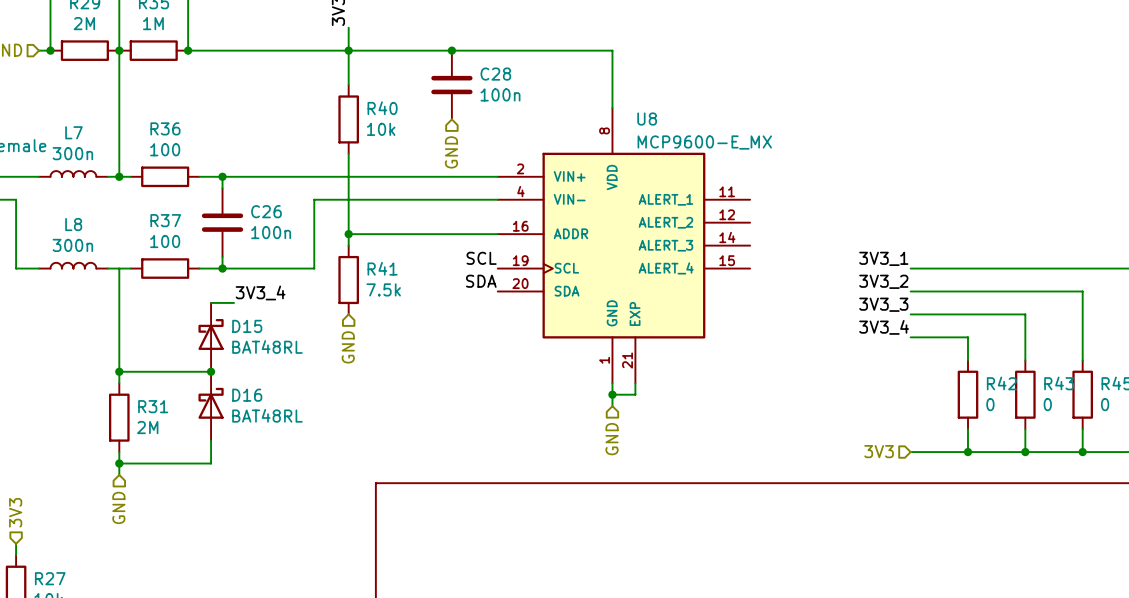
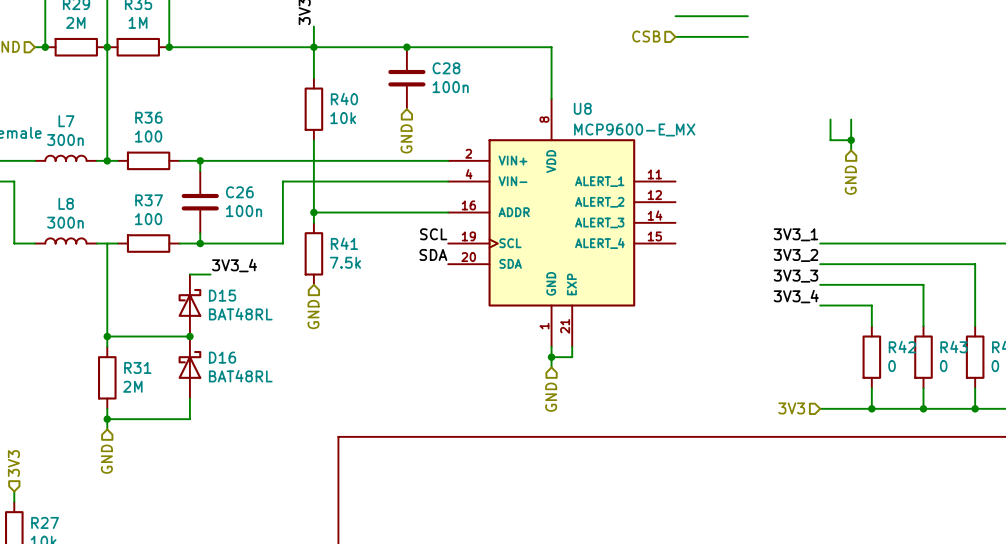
wire: none -> (675, 16) (747, 16)
hierarchical label: none -> CSB (646, 36)
wire: none -> (675, 36) (747, 36)
wire: none -> (830, 119) (830, 140) (851, 140)
wire: none -> (851, 119) (851, 150)
junction: none -> (851, 140)
hierarchical label: none -> GND (850, 180)

